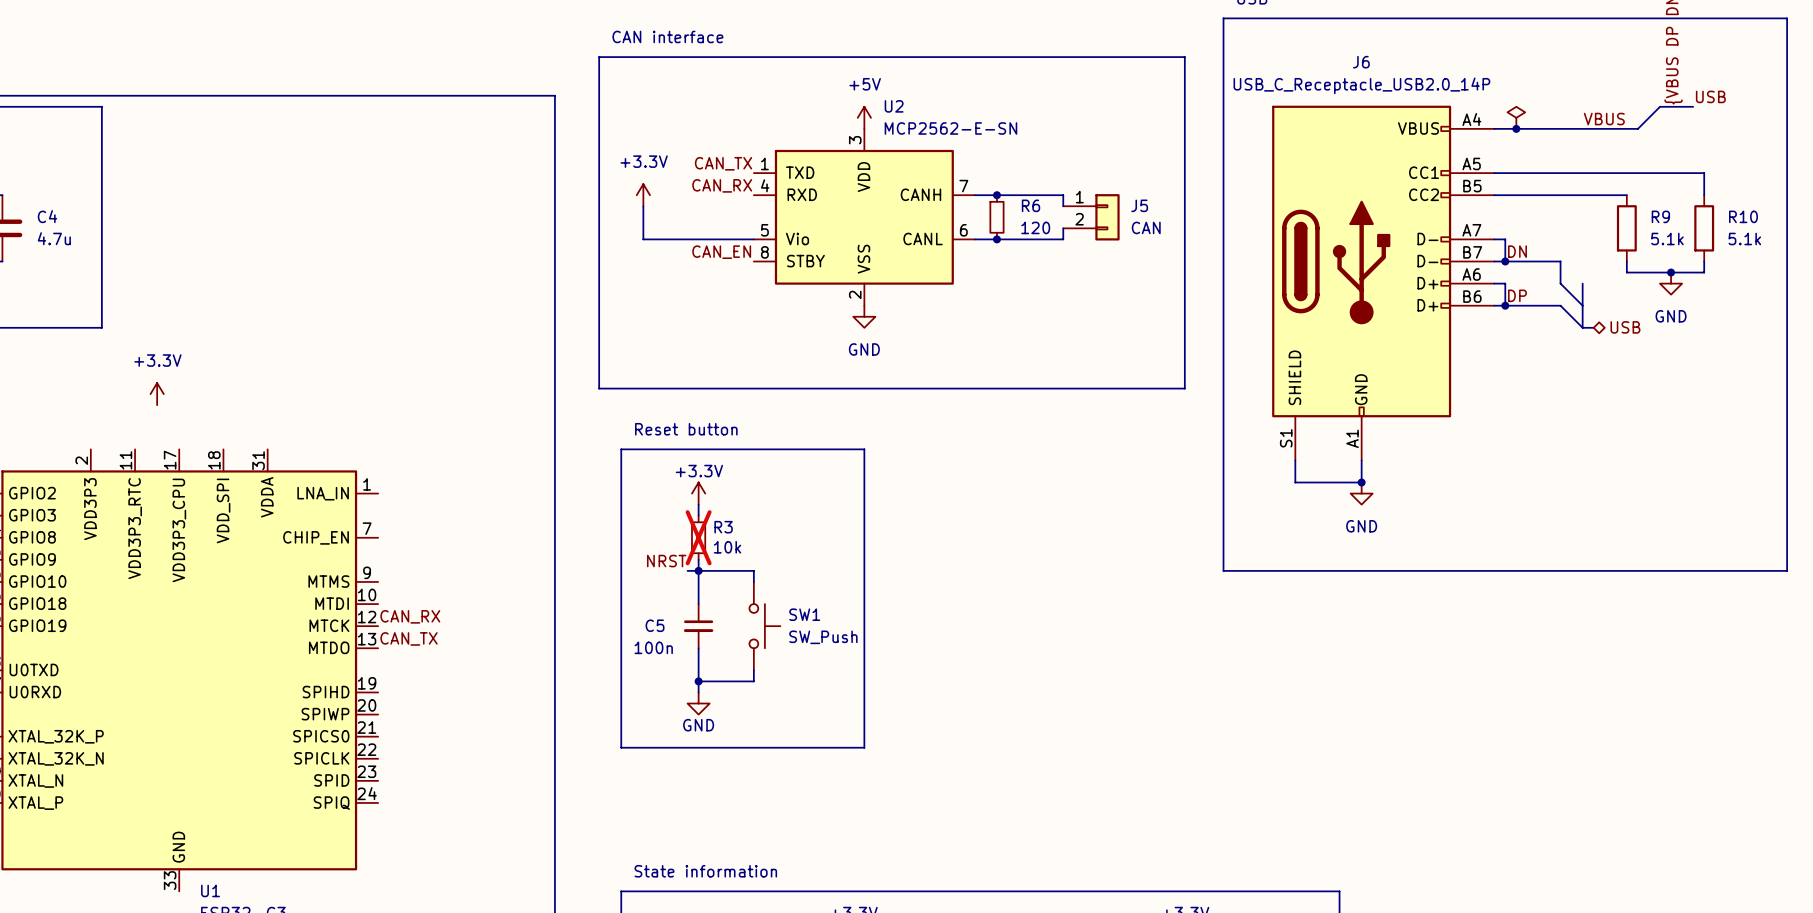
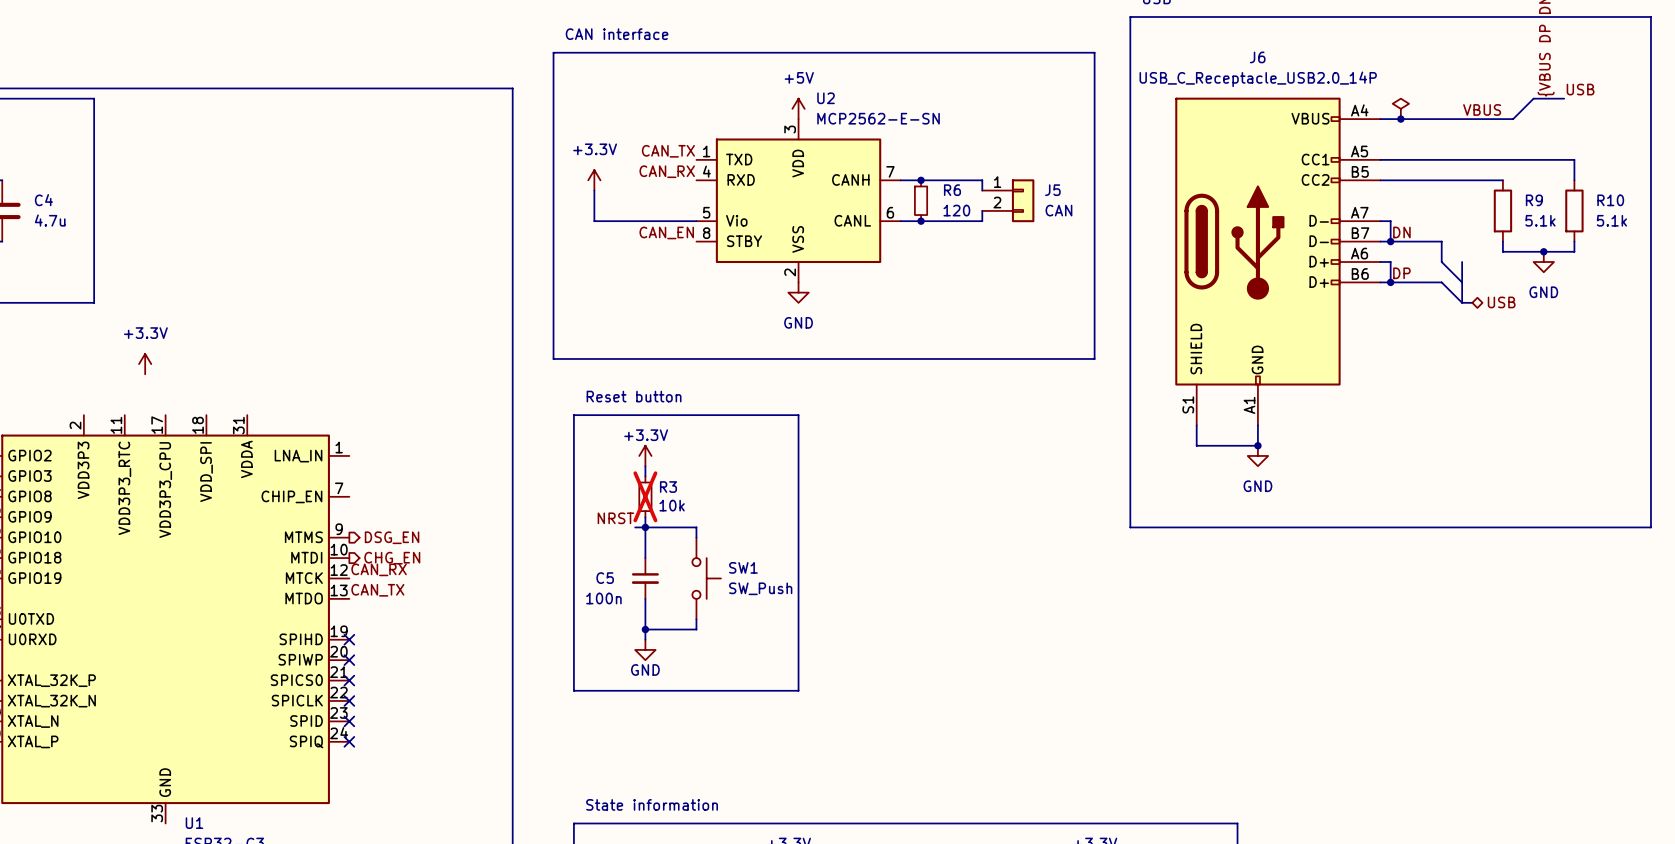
hierarchical label: none -> DSG_EN (392, 537)
hierarchical label: none -> CHG_EN (392, 558)
no-connect mark: none -> (349, 639)
no-connect mark: none -> (349, 660)
no-connect mark: none -> (349, 680)
no-connect mark: none -> (349, 700)
no-connect mark: none -> (349, 721)
no-connect mark: none -> (349, 741)

